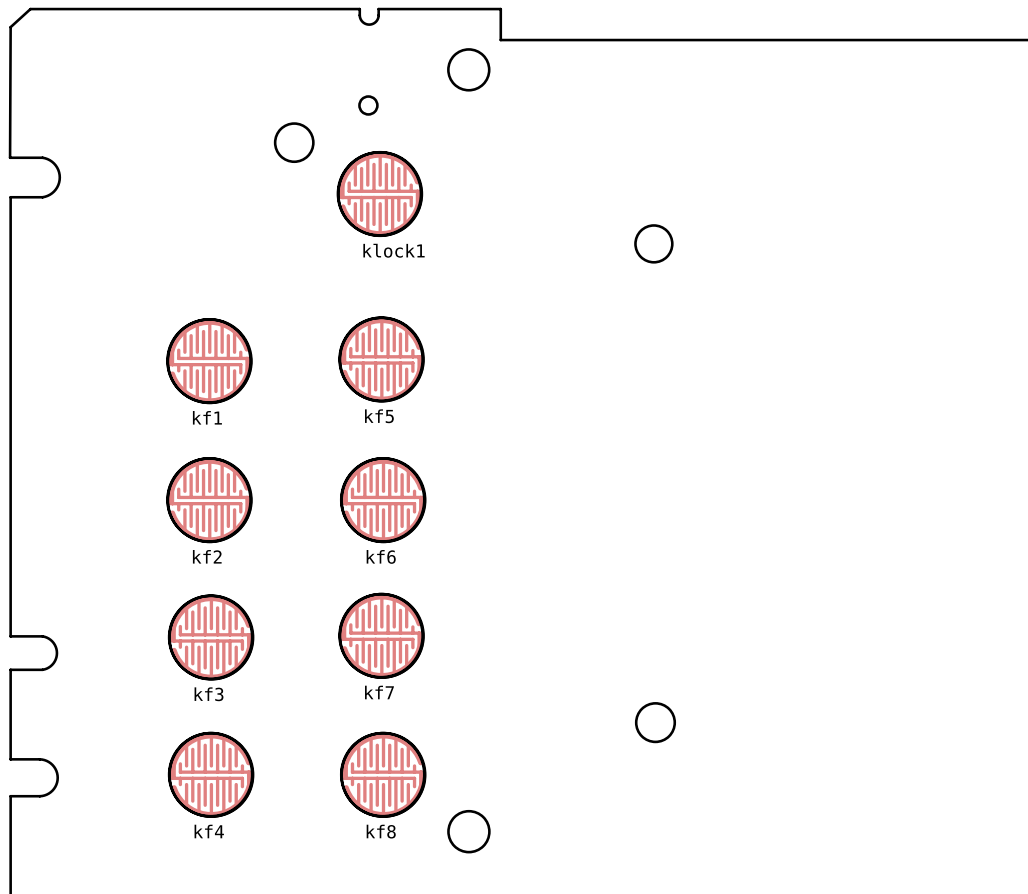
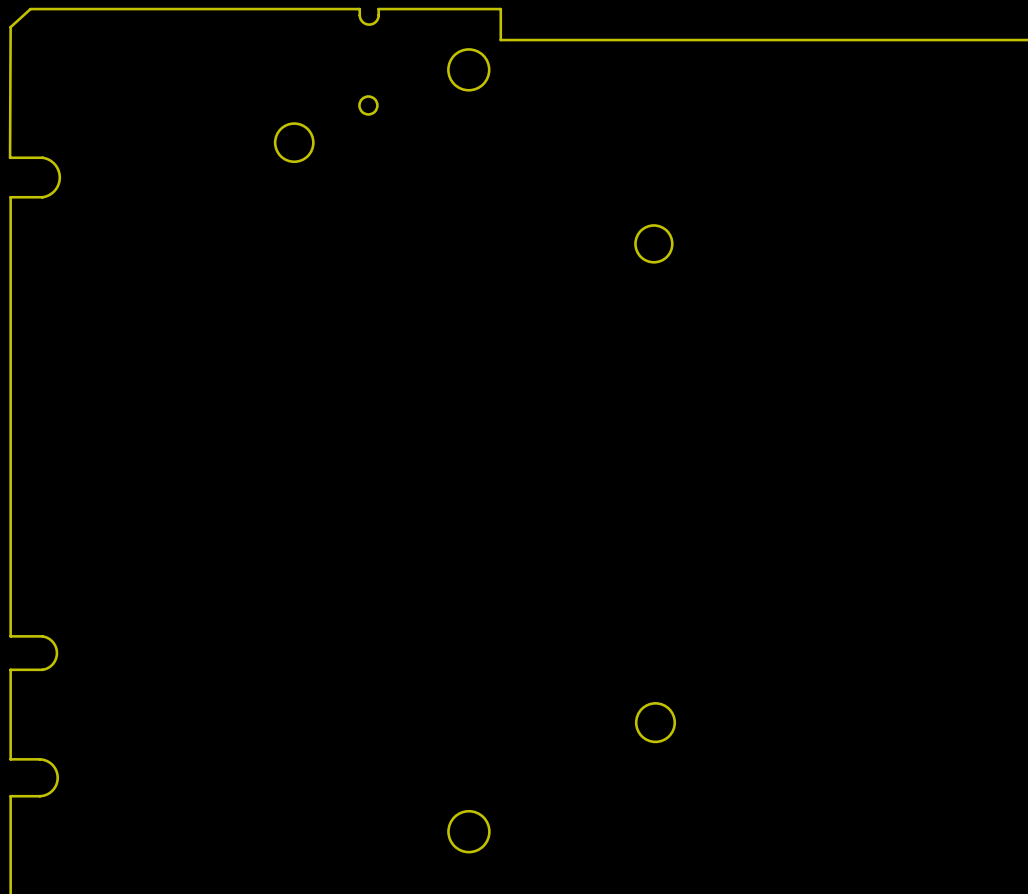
klock1: (379, 194) -> none
kf5: (381, 359) -> none
kf1: (209, 361) -> none
kf2: (209, 500) -> none
kf6: (383, 500) -> none
kf7: (381, 635) -> none
kf3: (211, 637) -> none
kf4: (211, 774) -> none
kf8: (383, 774) -> none

